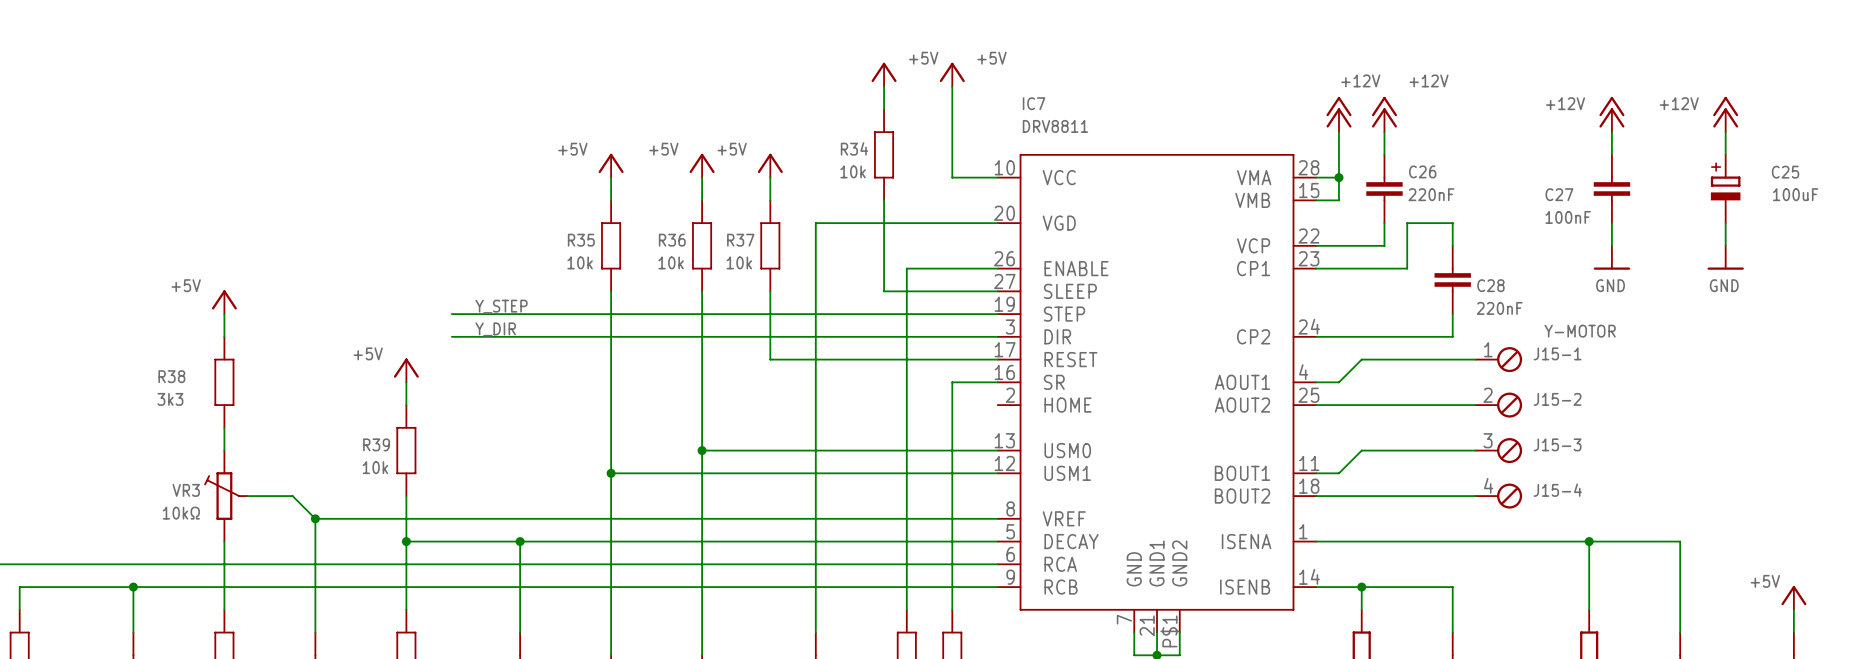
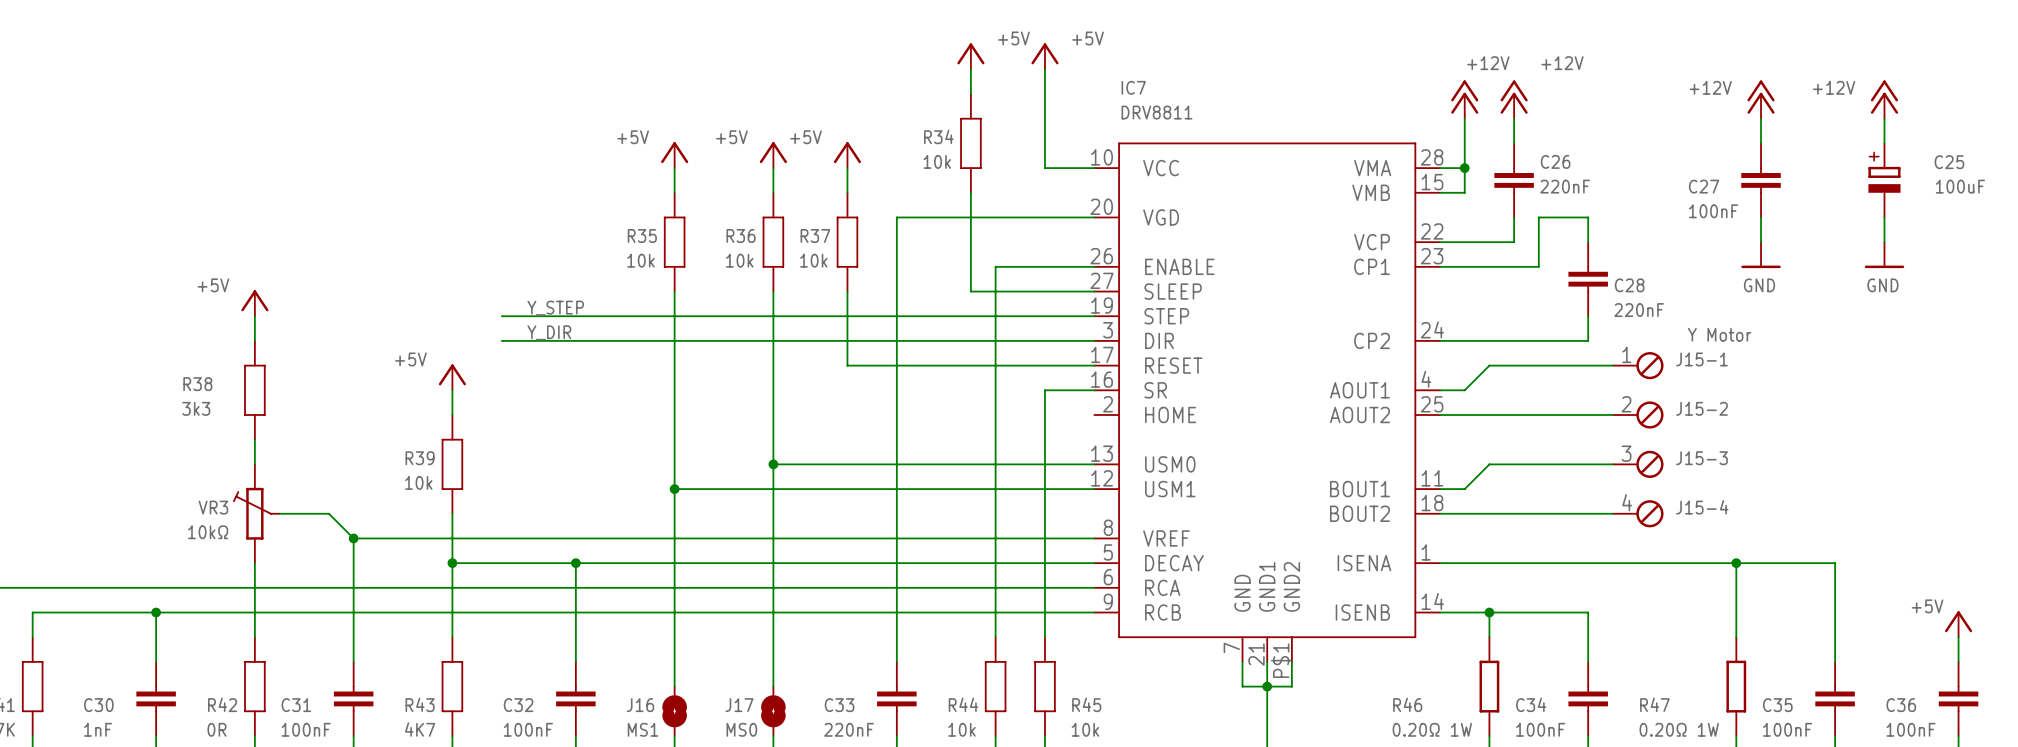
J15-4 value: Y-MOTOR (1580, 331) -> Y Motor (1719, 334)

